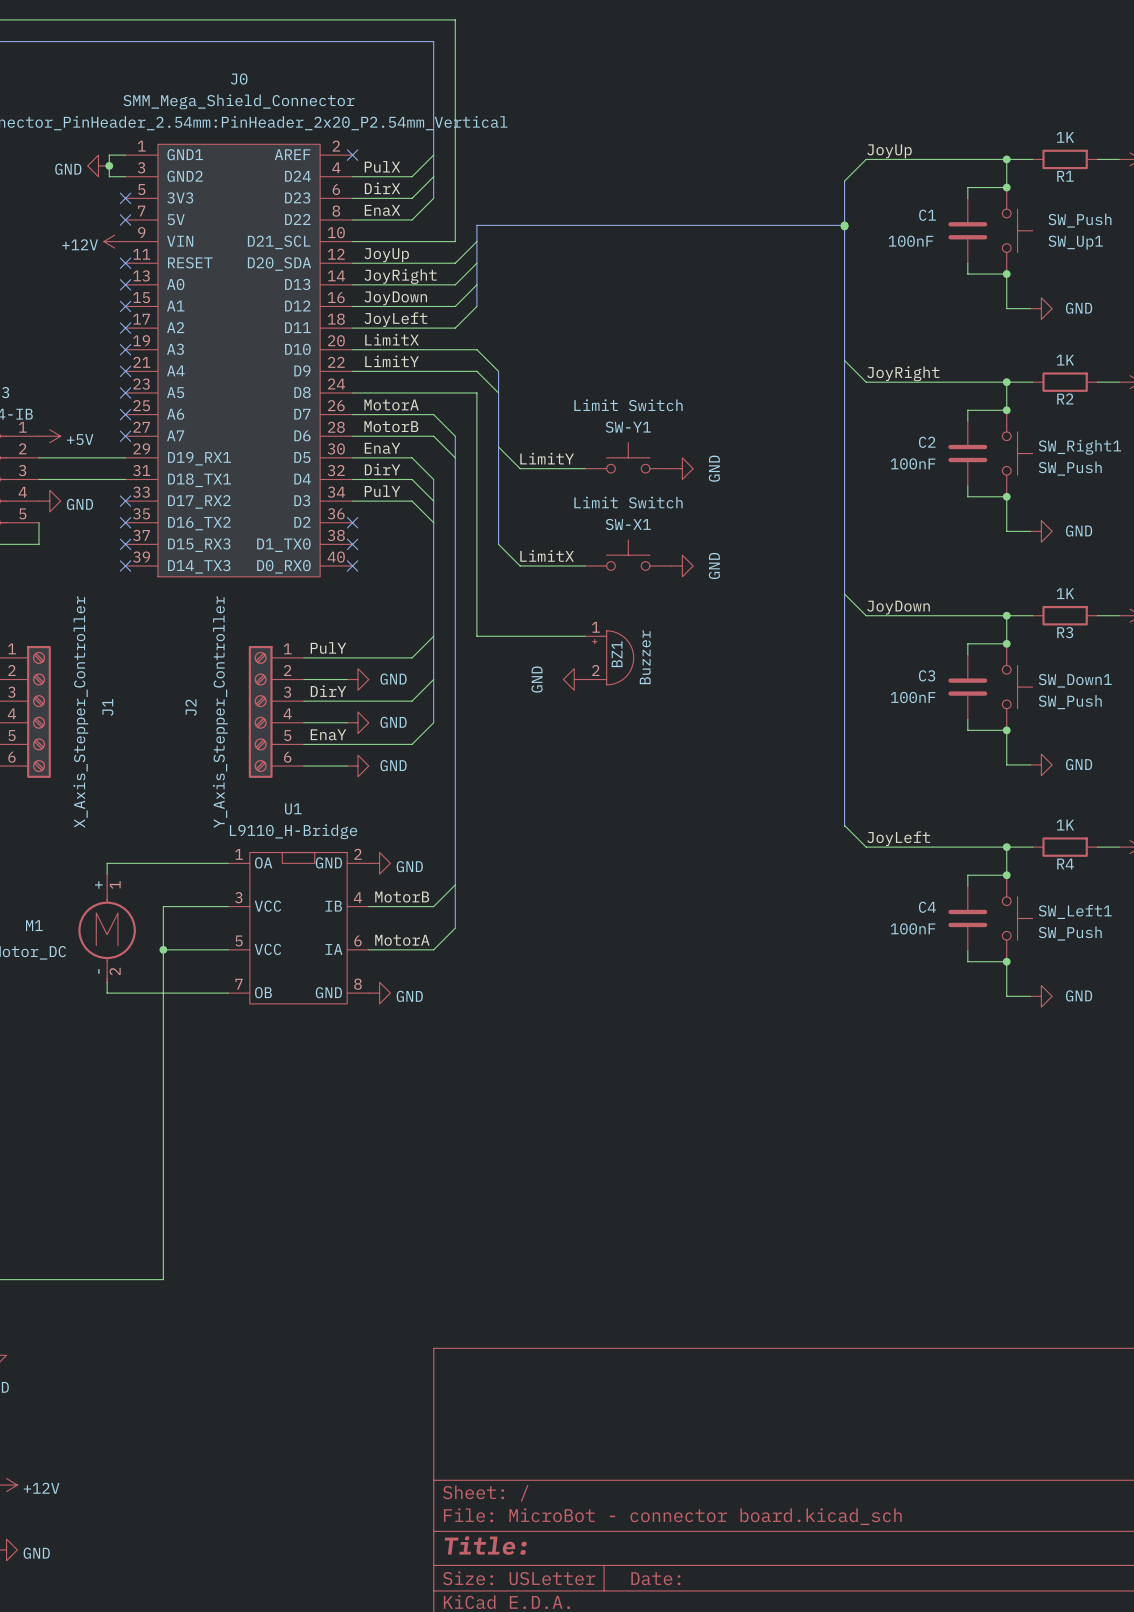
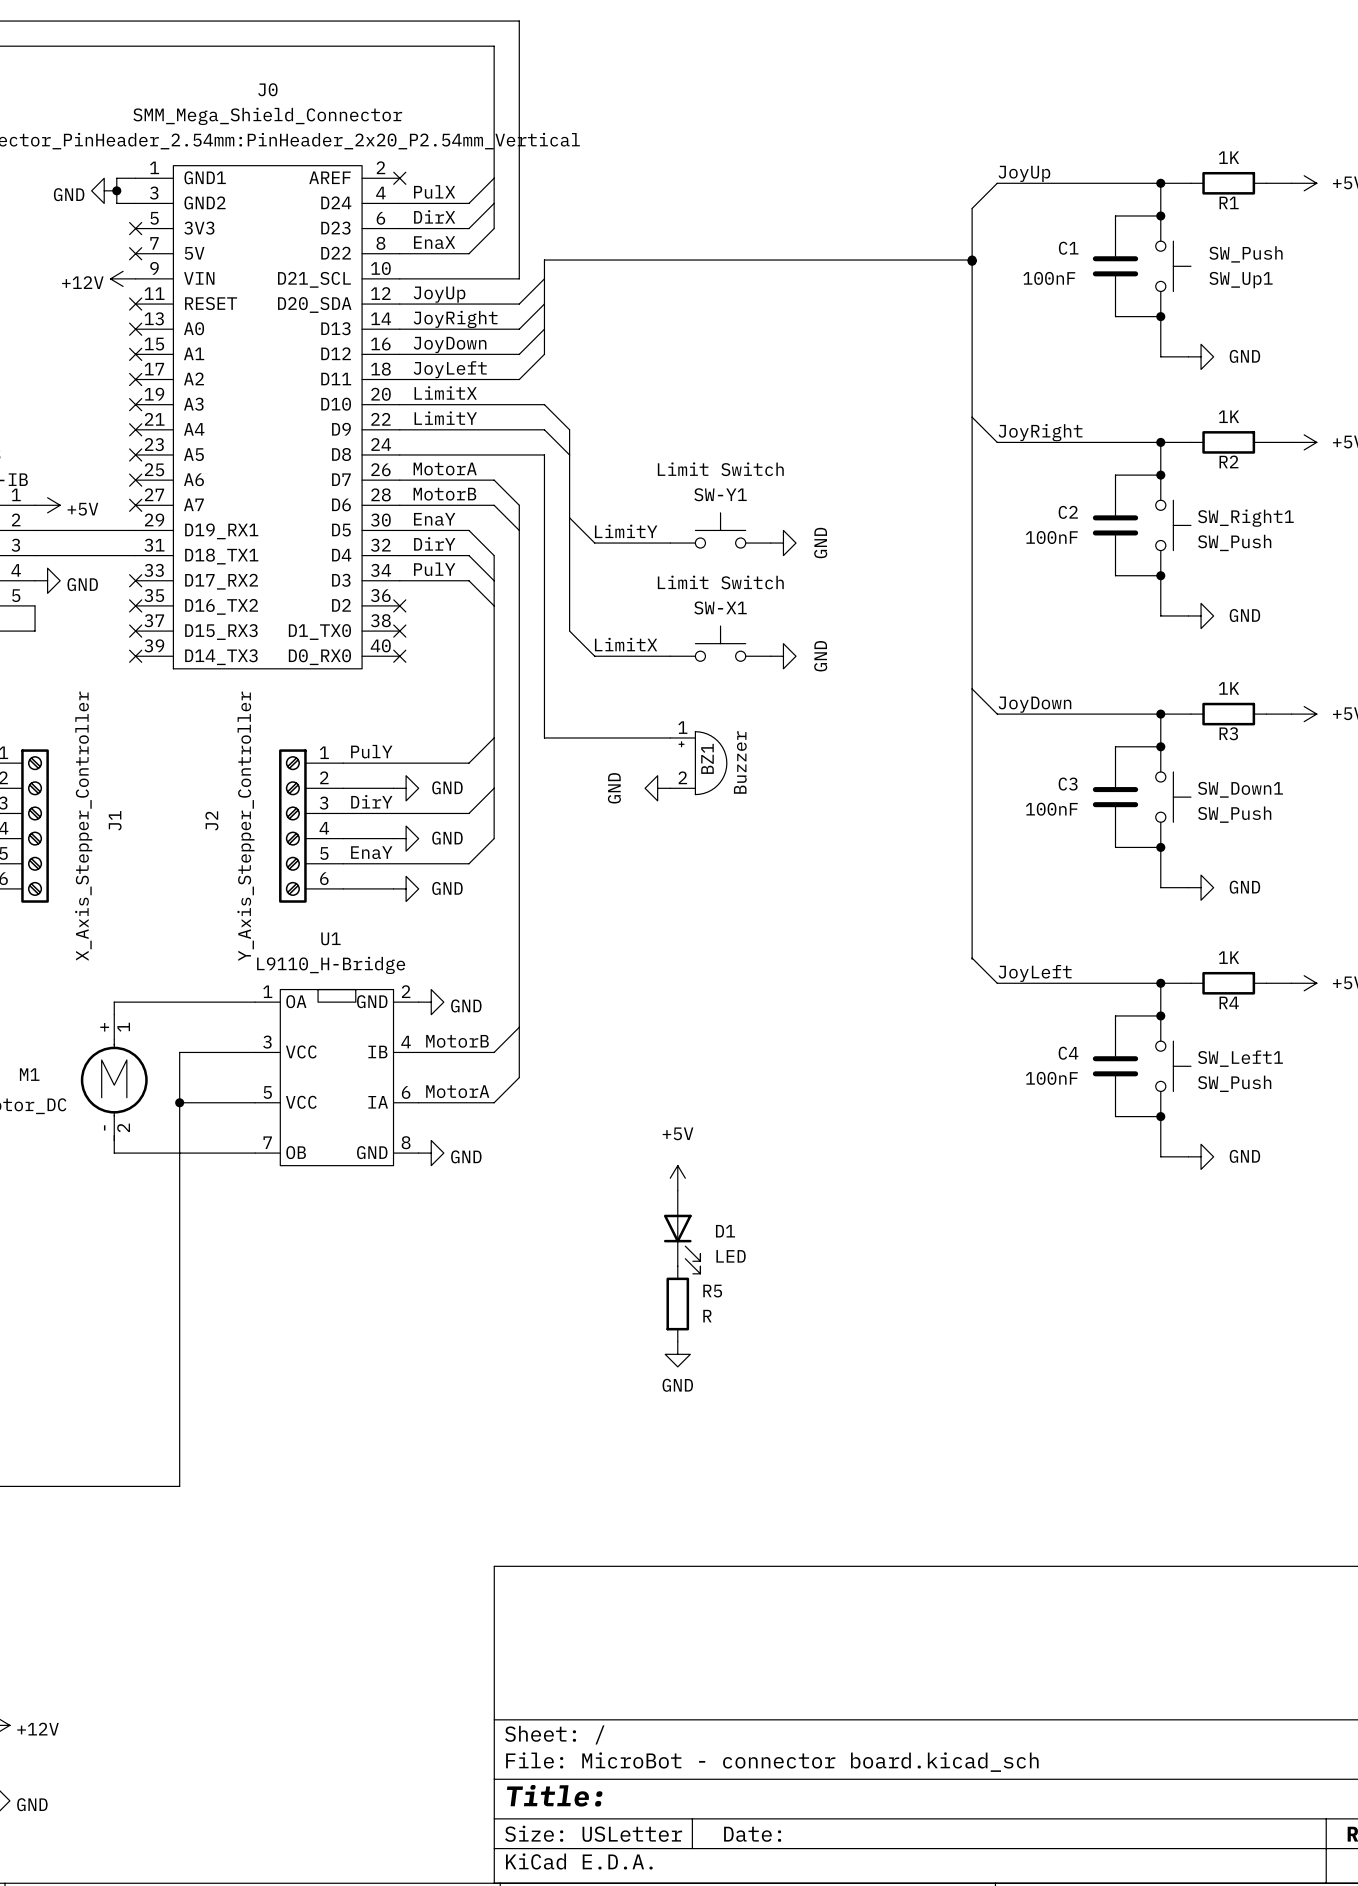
power symbol: none -> +5V (677, 1178)
D1: none -> LED (682, 1232)
R5: none -> R (677, 1304)
power symbol: none -> GND (677, 1354)

